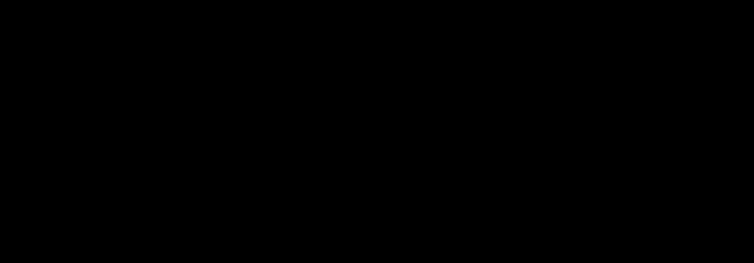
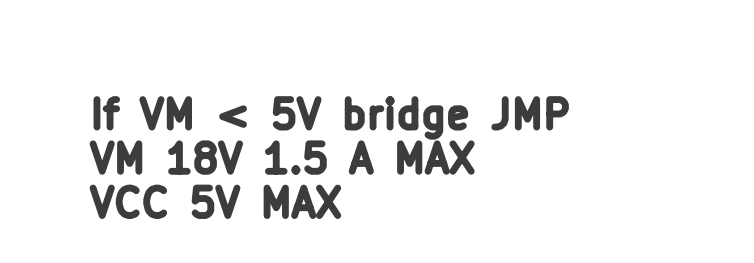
text: none -> If VM < 5V bridge JMP (331, 117)
text: none -> VM 18V 1.5 A MAX (282, 157)
text: none -> VCC 5V MAX (215, 201)

